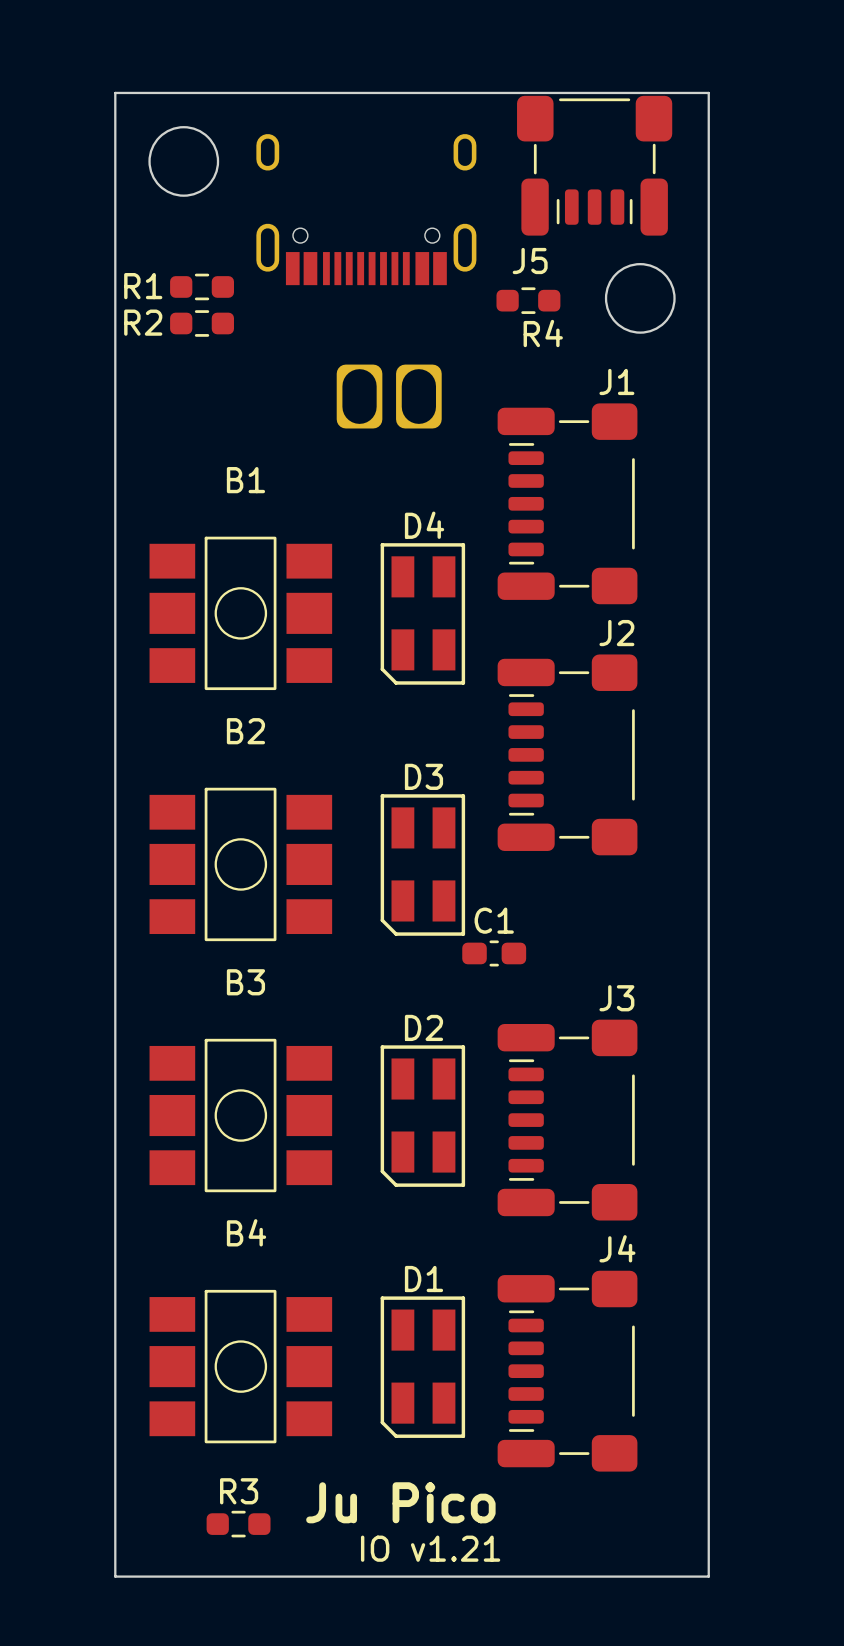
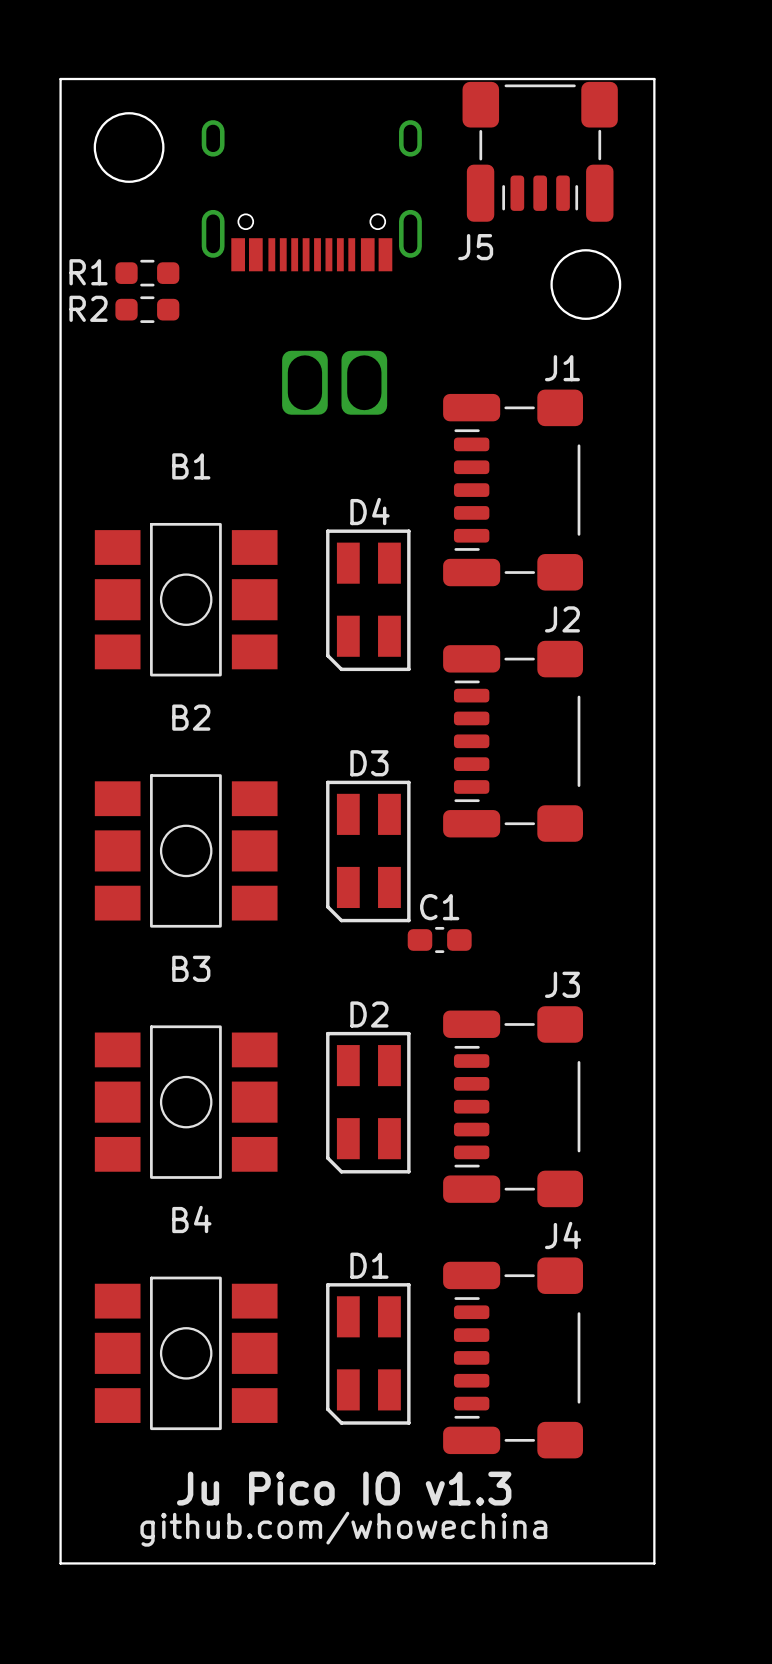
R4: (528, 300) -> none
text: Ju Pico (400, 1502) -> Ju Pico IO v1.3 (344, 1488)
R3: (238, 1524) -> none
text: none -> github.com/whowechina (343, 1529)
text: IO v1.21 (430, 1548) -> none

